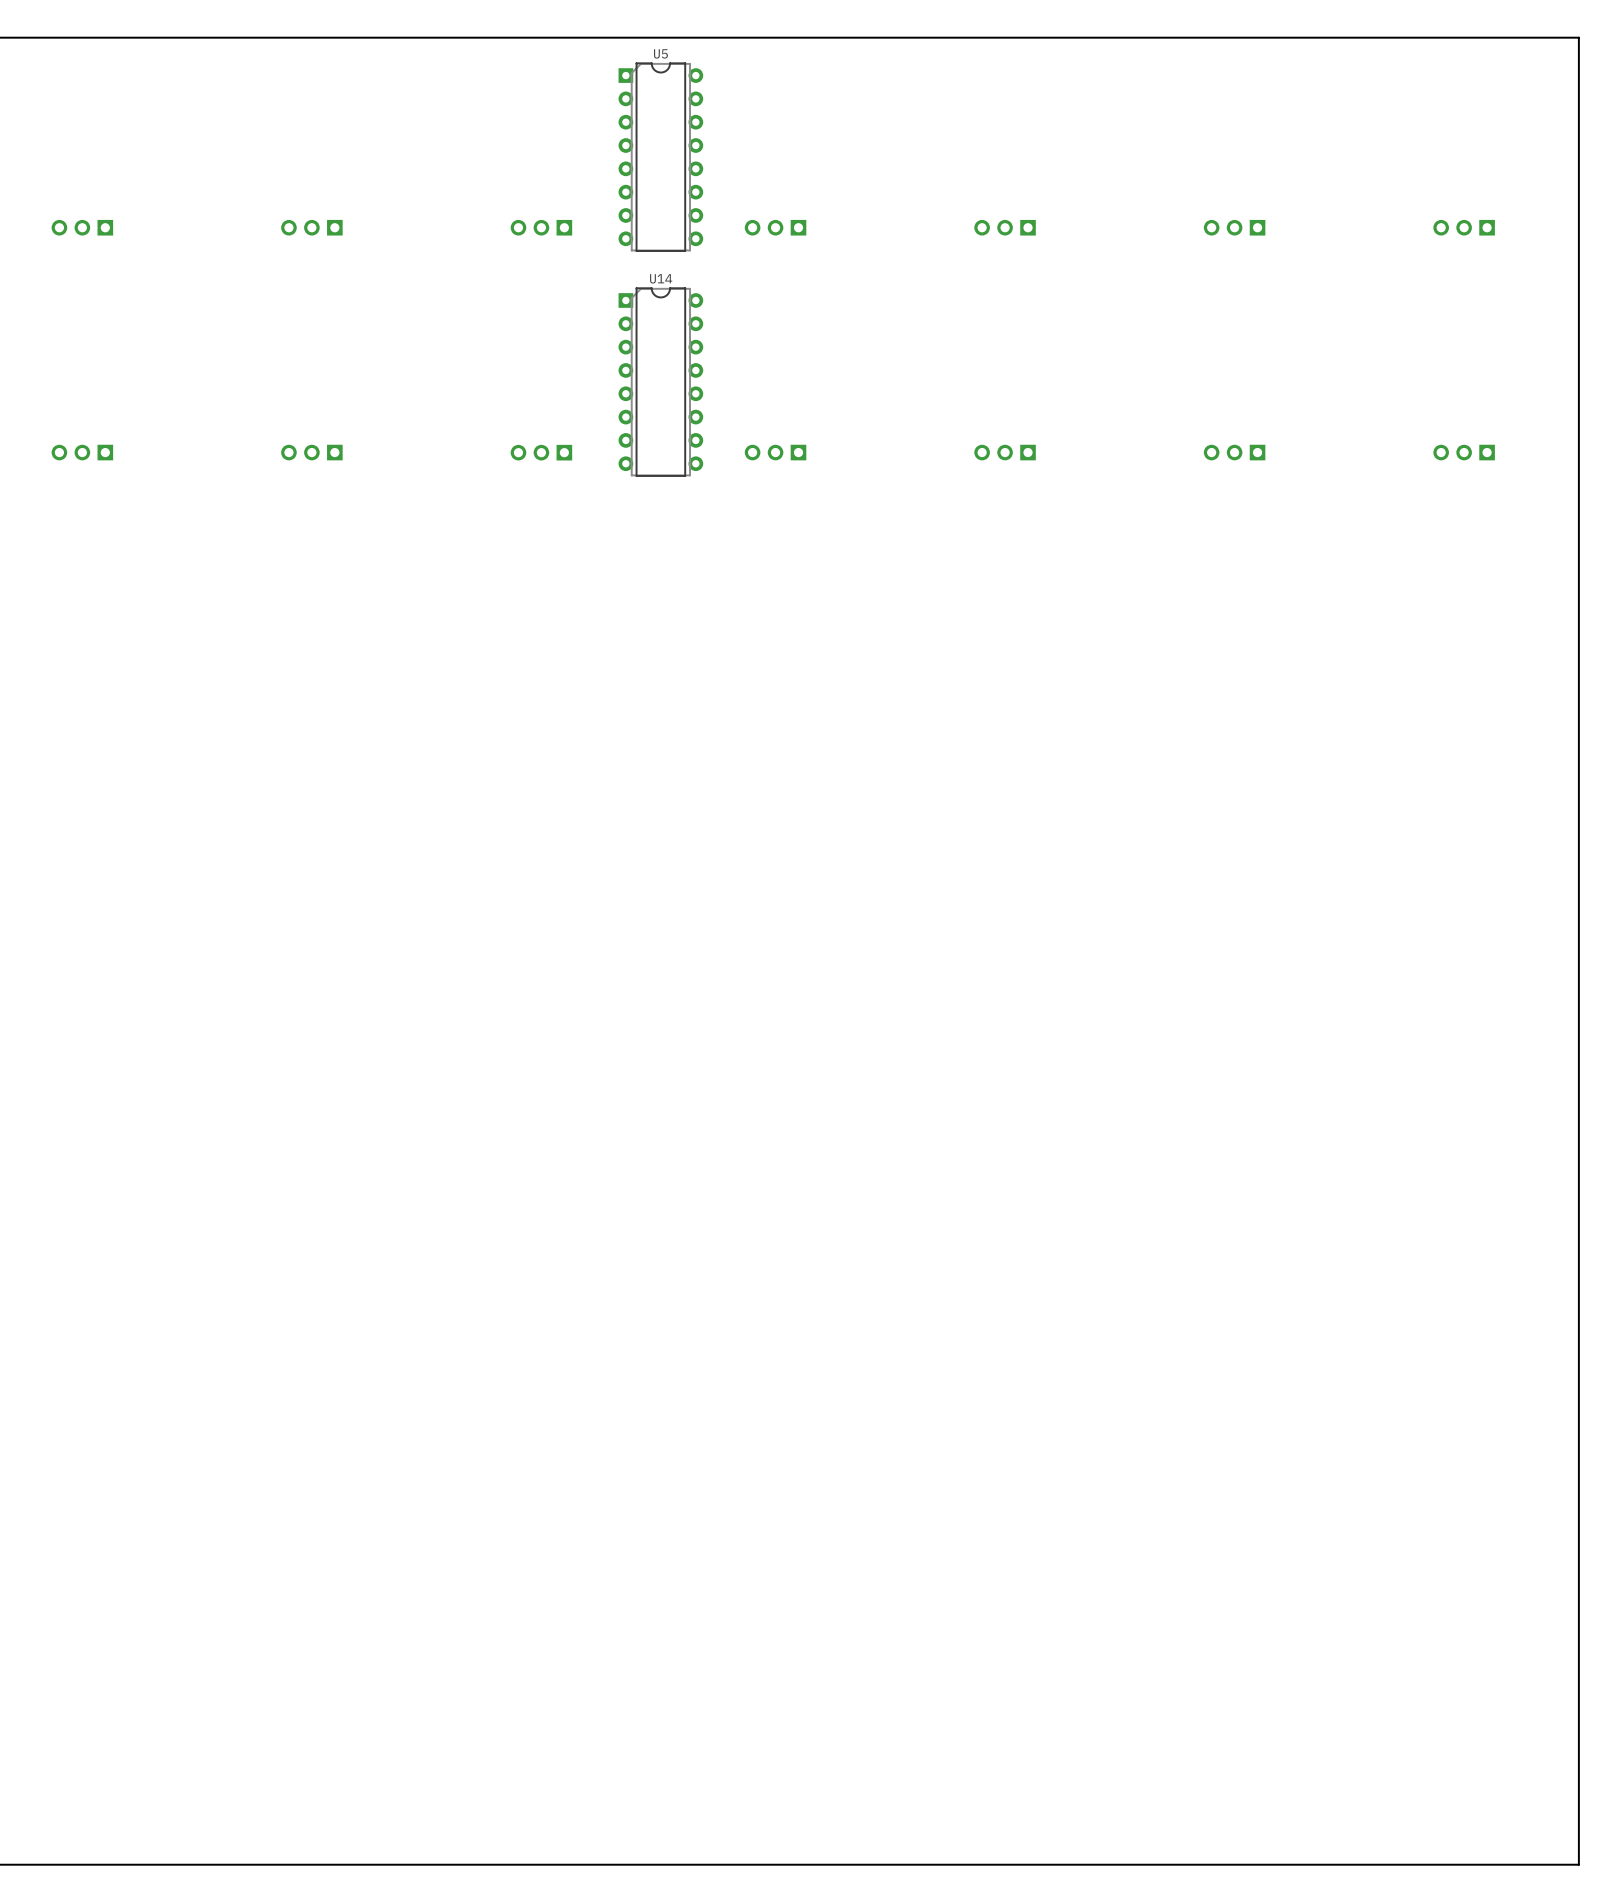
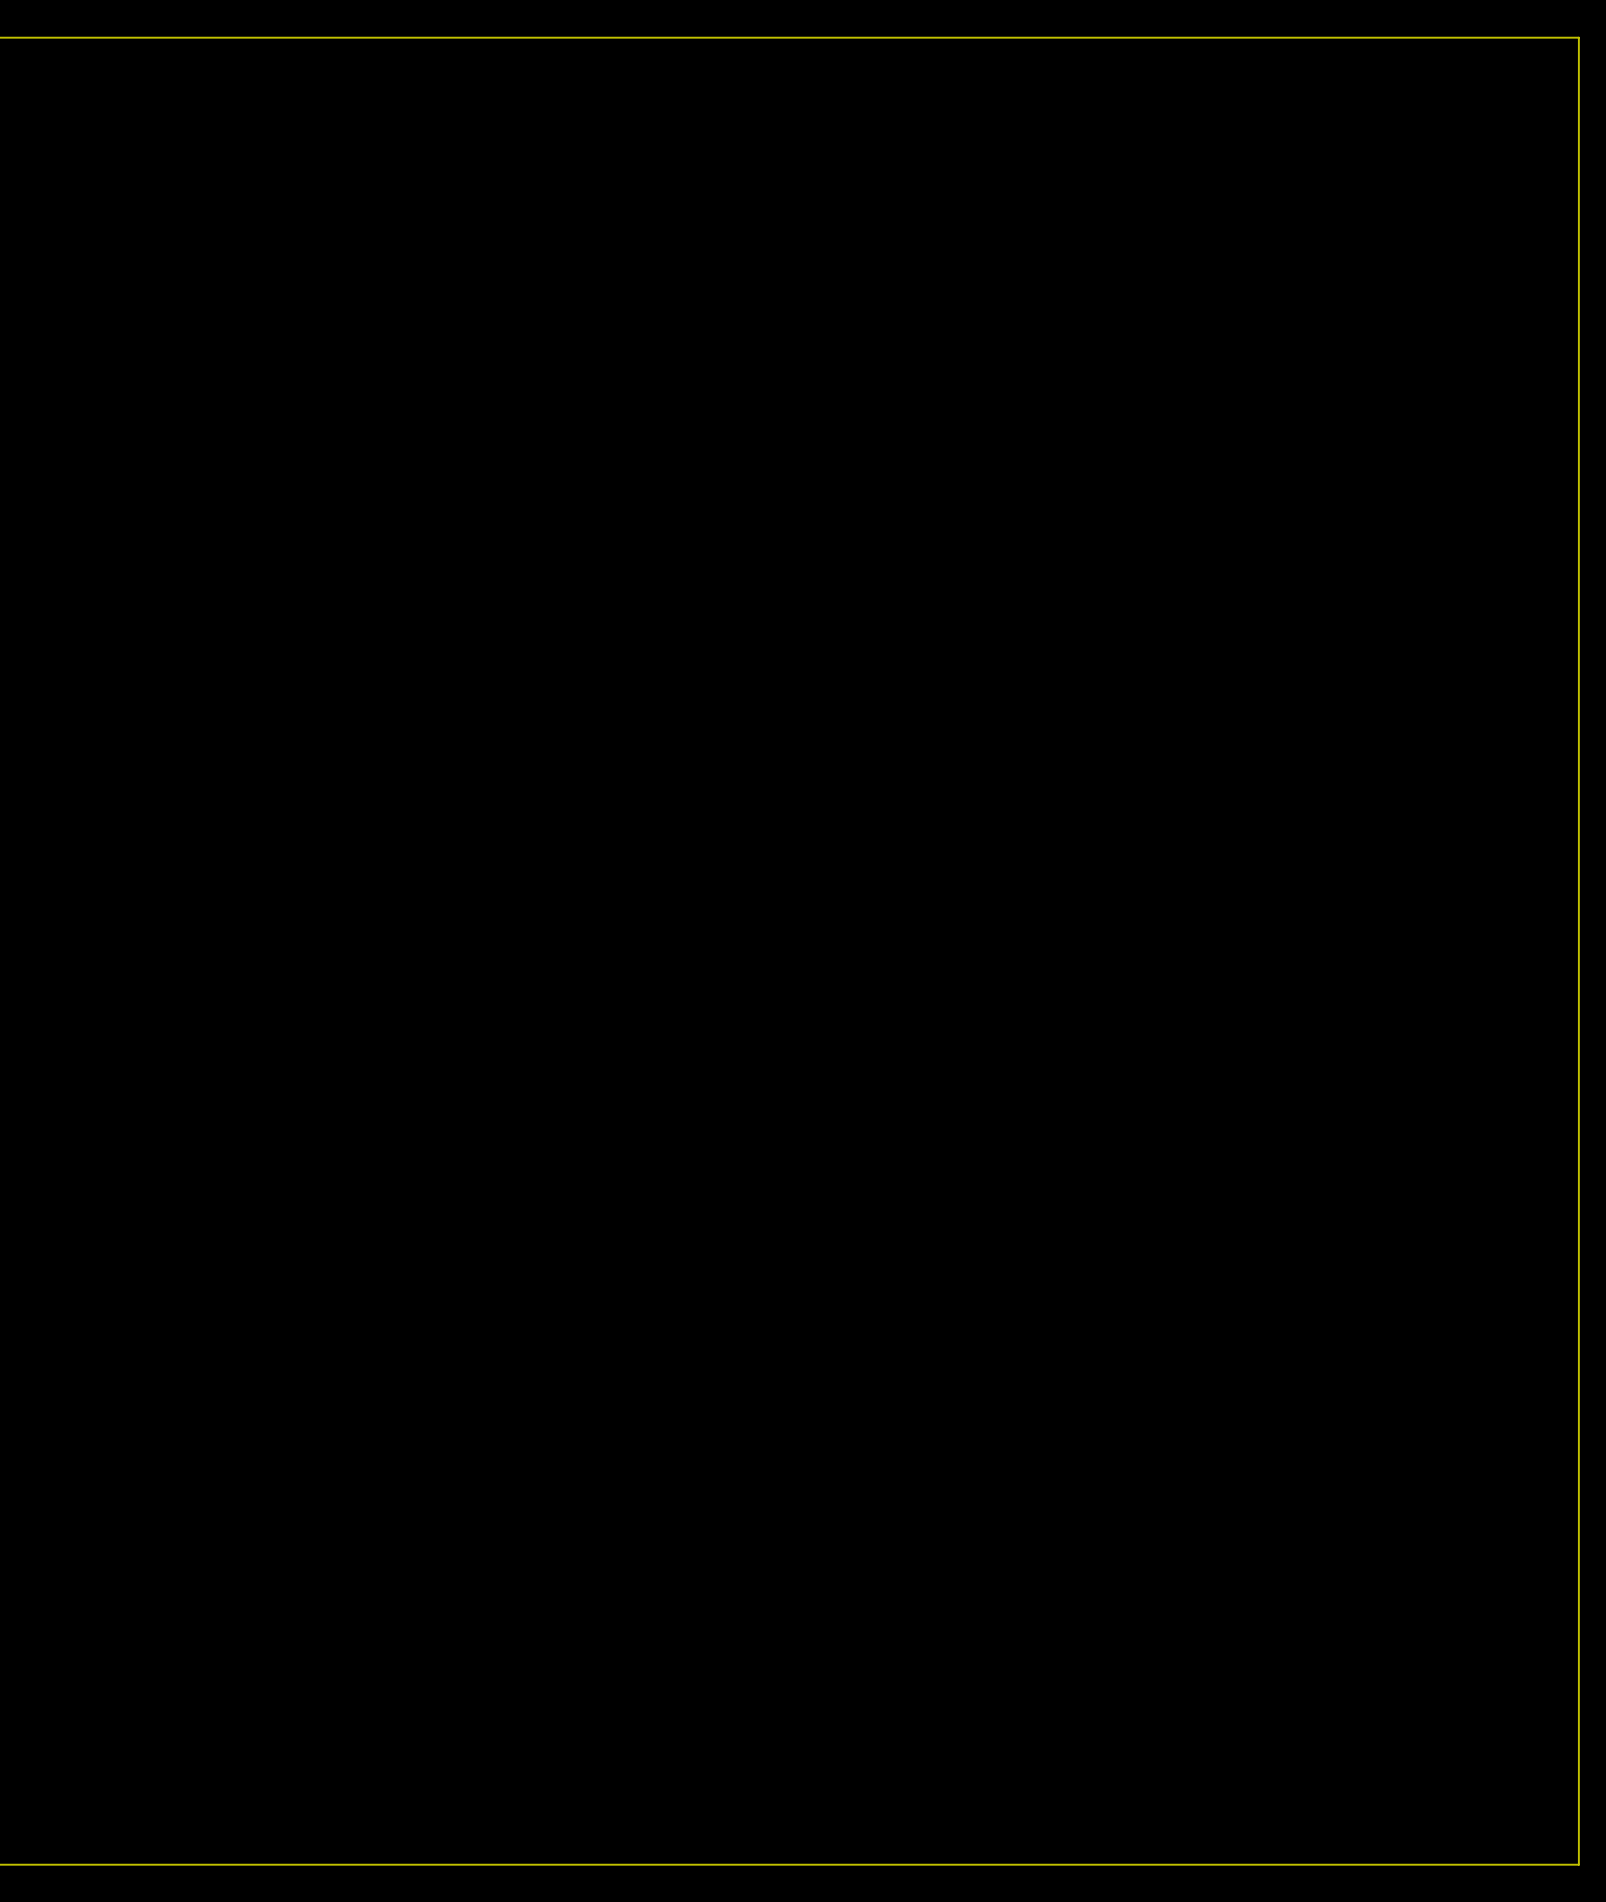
U5: (660, 157) -> none
part: (82, 227) -> none
part: (311, 227) -> none
part: (541, 227) -> none
part: (775, 227) -> none
part: (1005, 227) -> none
part: (1234, 227) -> none
part: (1464, 227) -> none
U14: (660, 382) -> none
part: (82, 452) -> none
part: (311, 452) -> none
part: (541, 452) -> none
part: (775, 452) -> none
part: (1005, 452) -> none
part: (1234, 452) -> none
part: (1464, 452) -> none

